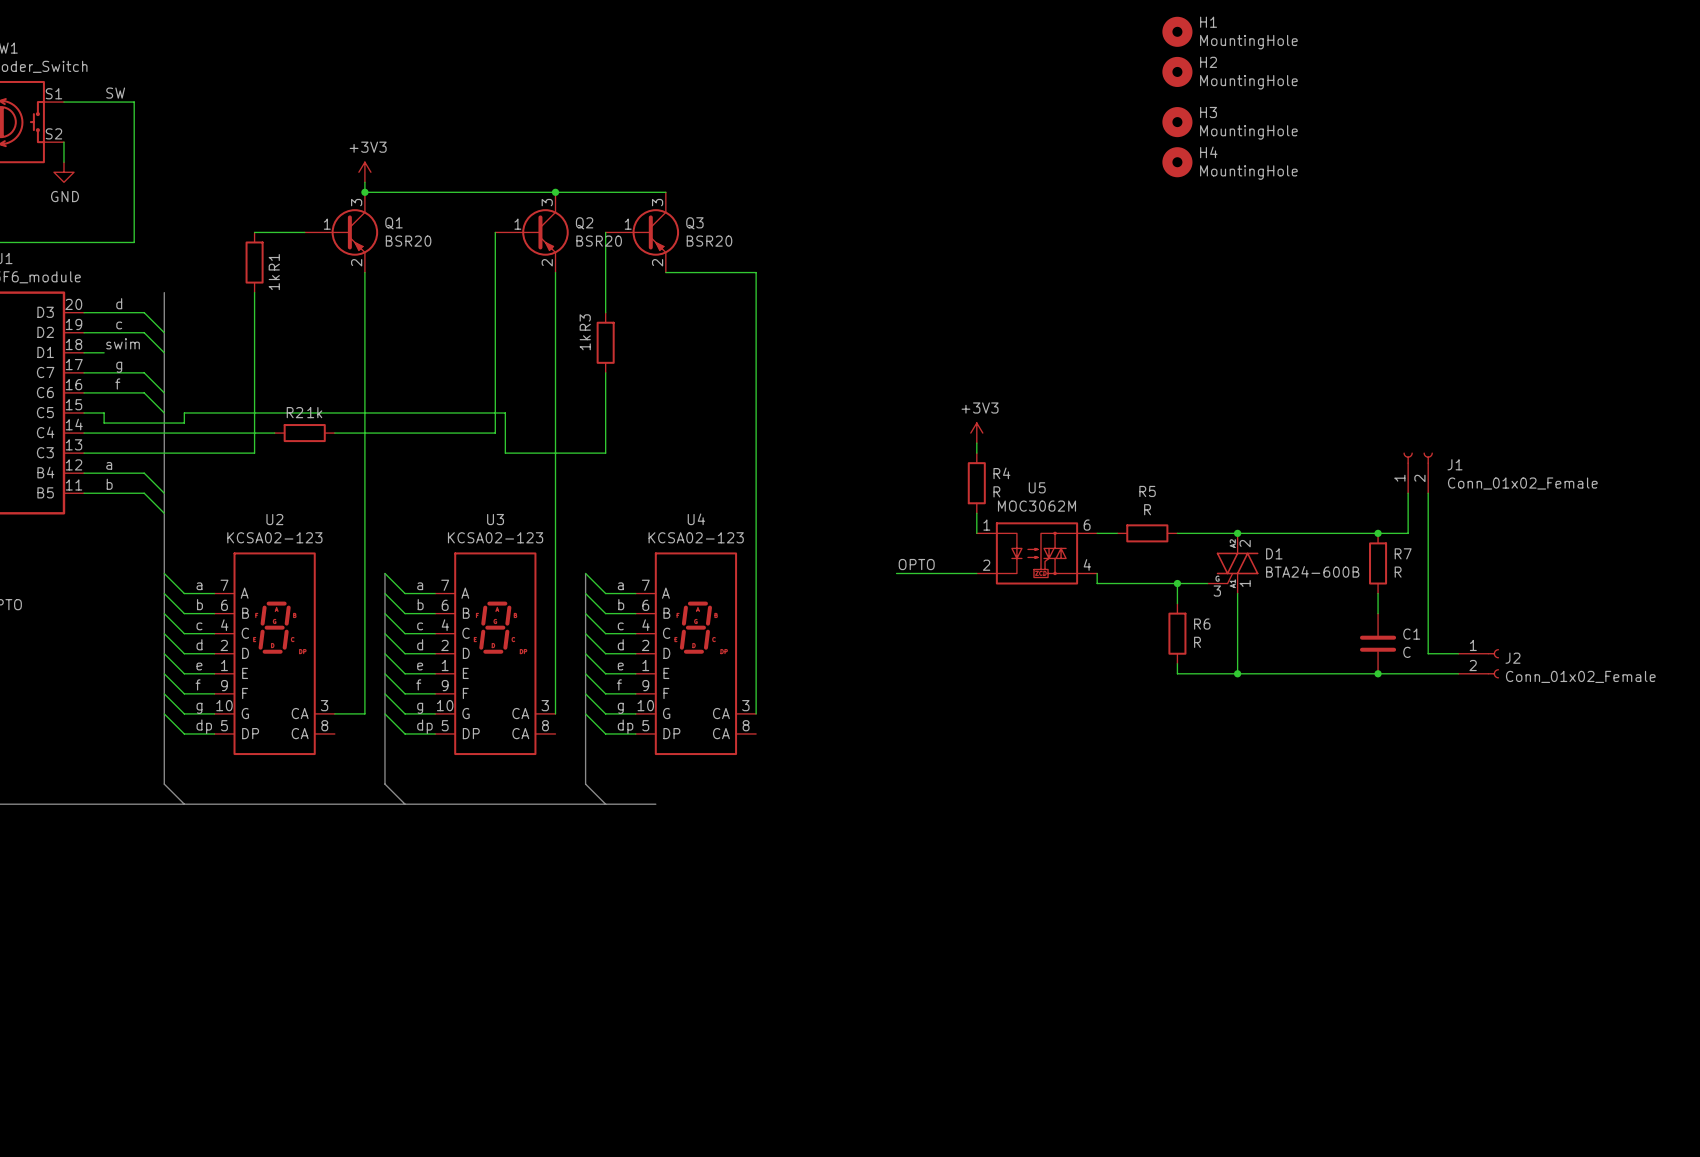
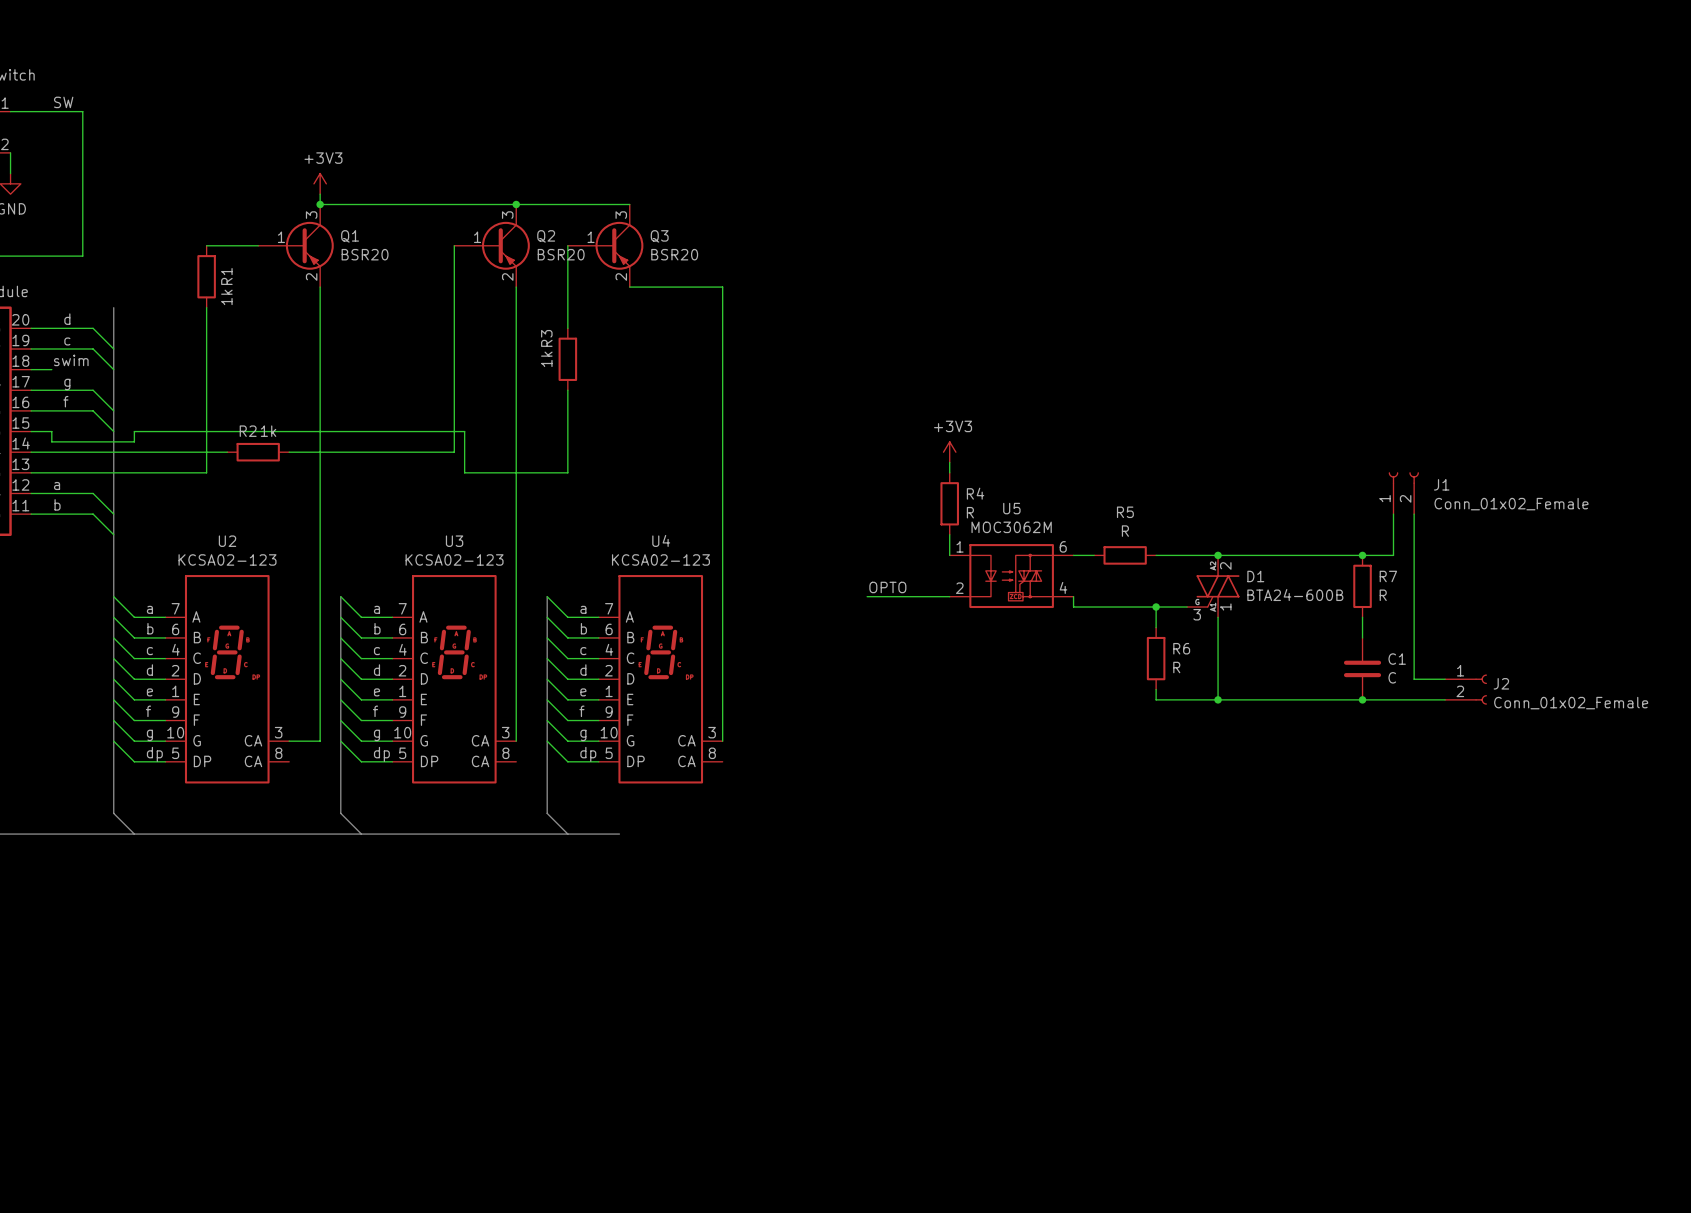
H1: MountingHole (1177, 31) -> none
H2: MountingHole (1177, 71) -> none
H3: MountingHole (1177, 122) -> none
H4: MountingHole (1177, 162) -> none

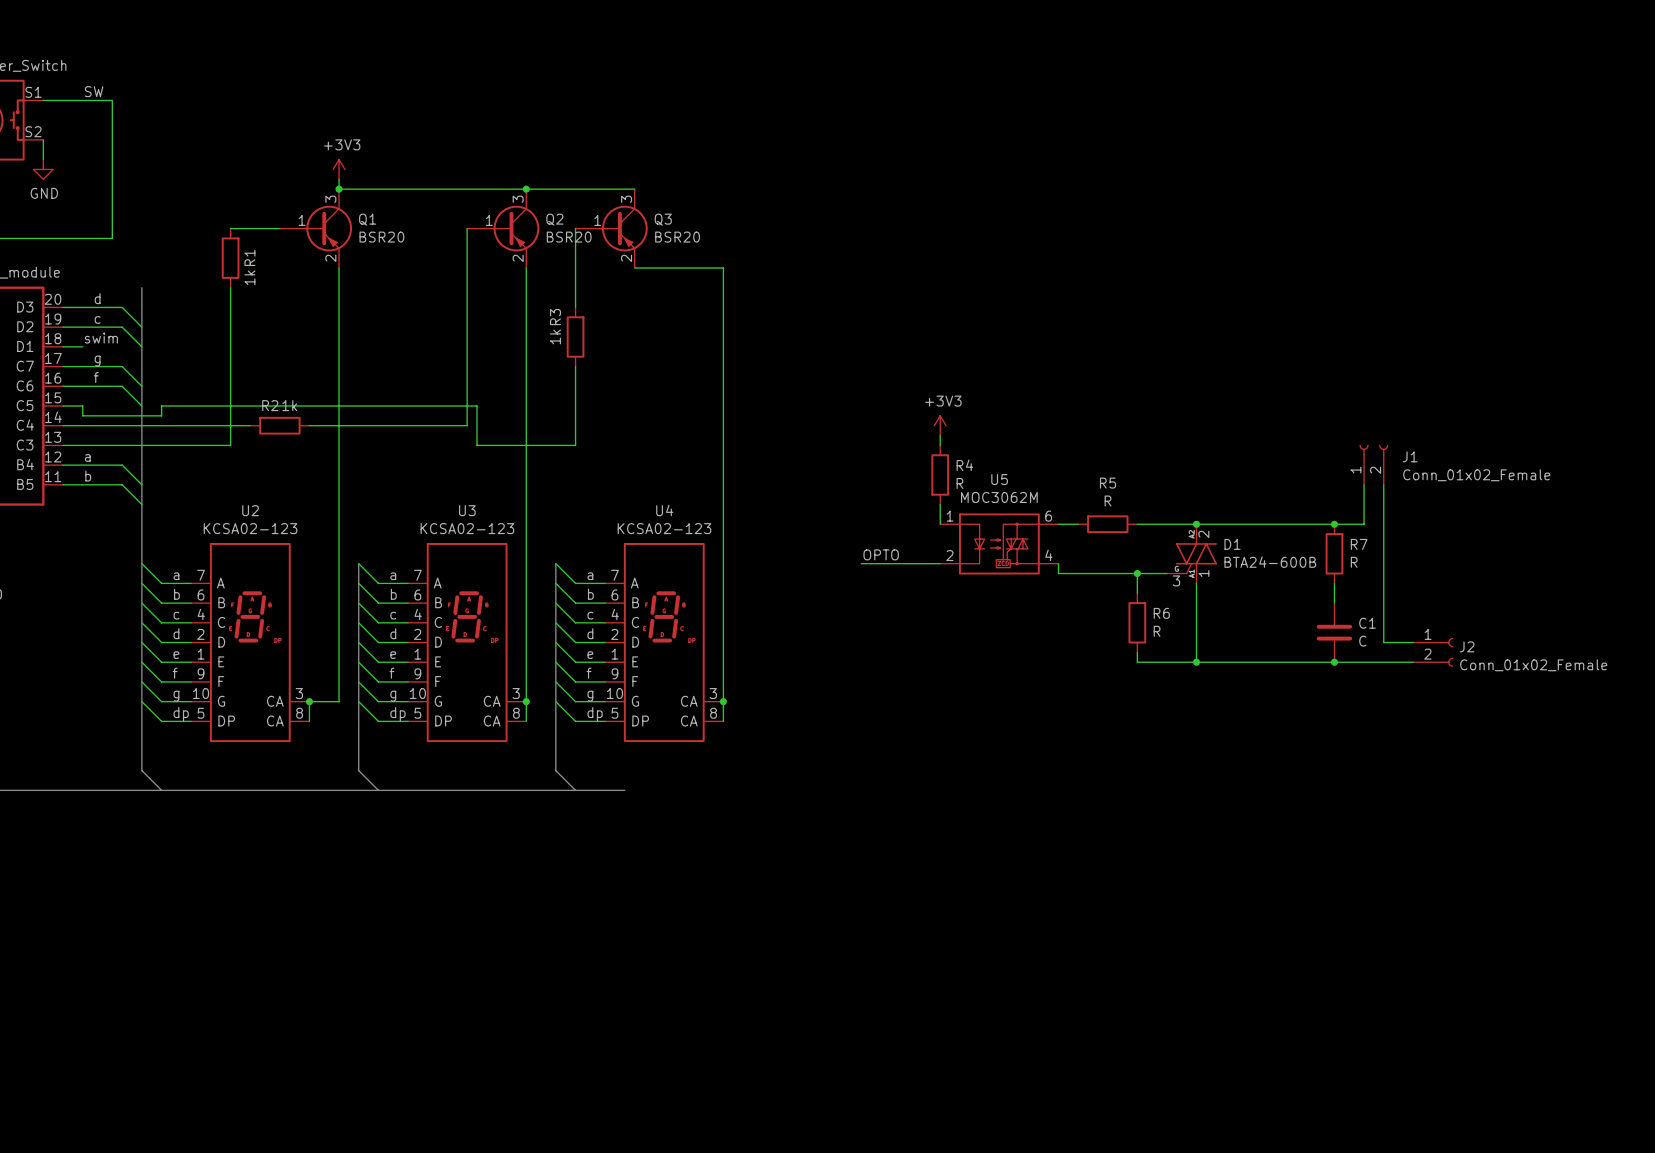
wire: none -> (309, 701) (309, 721)
junction: none -> (309, 701)
wire: none -> (526, 701) (526, 721)
junction: none -> (526, 701)
wire: none -> (723, 701) (723, 721)
junction: none -> (723, 701)

